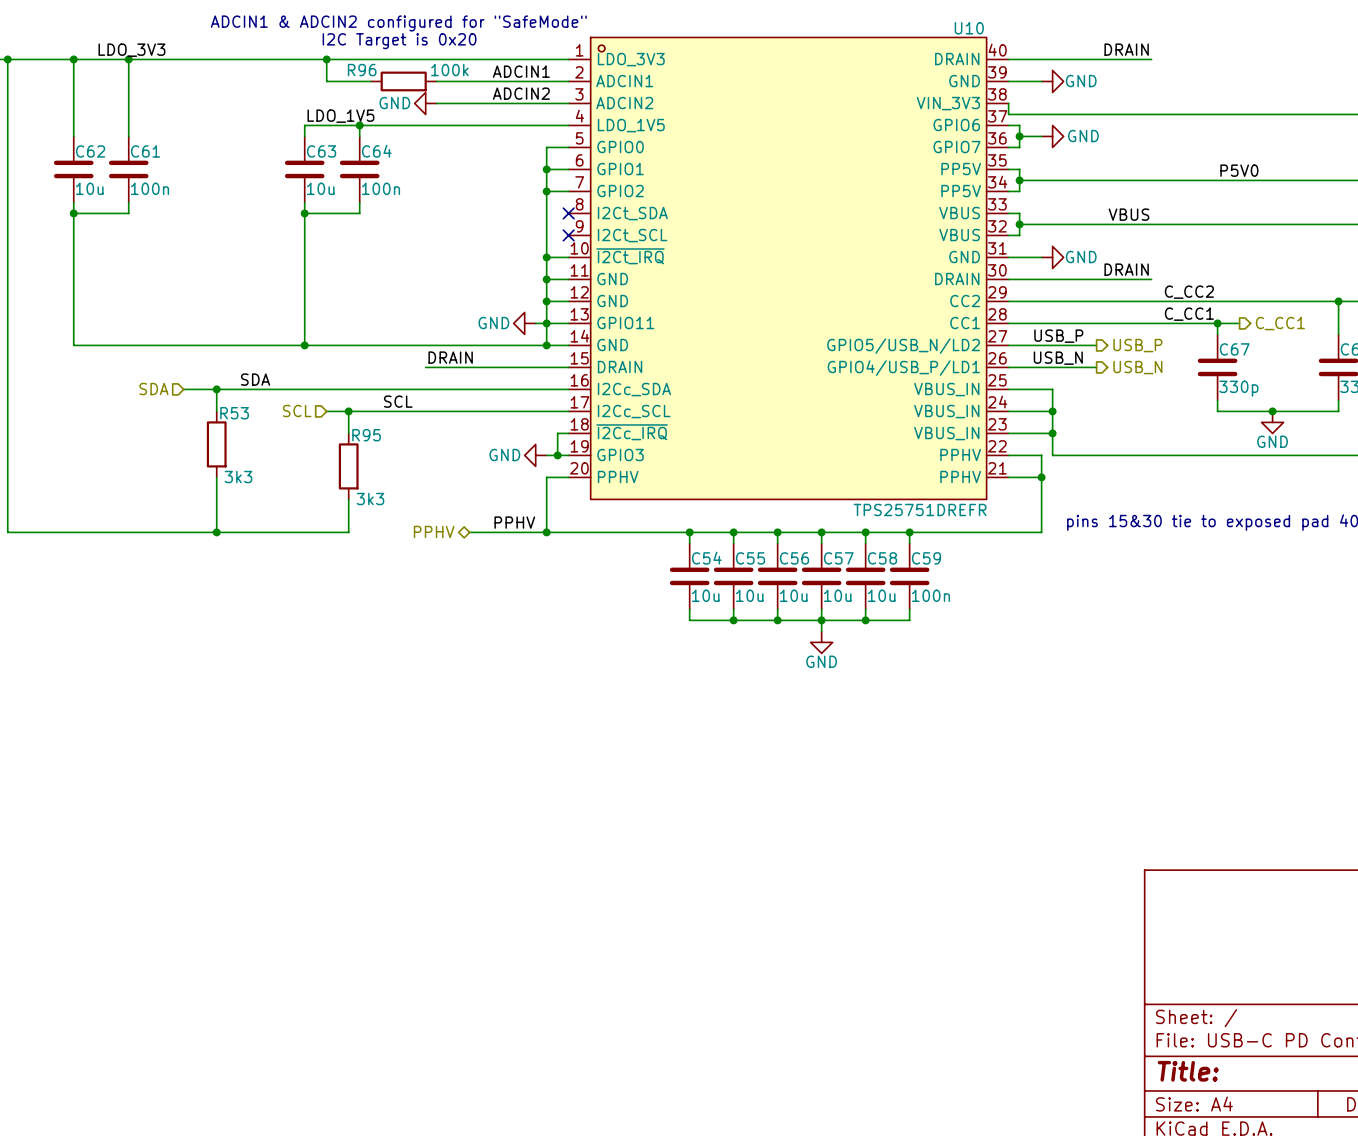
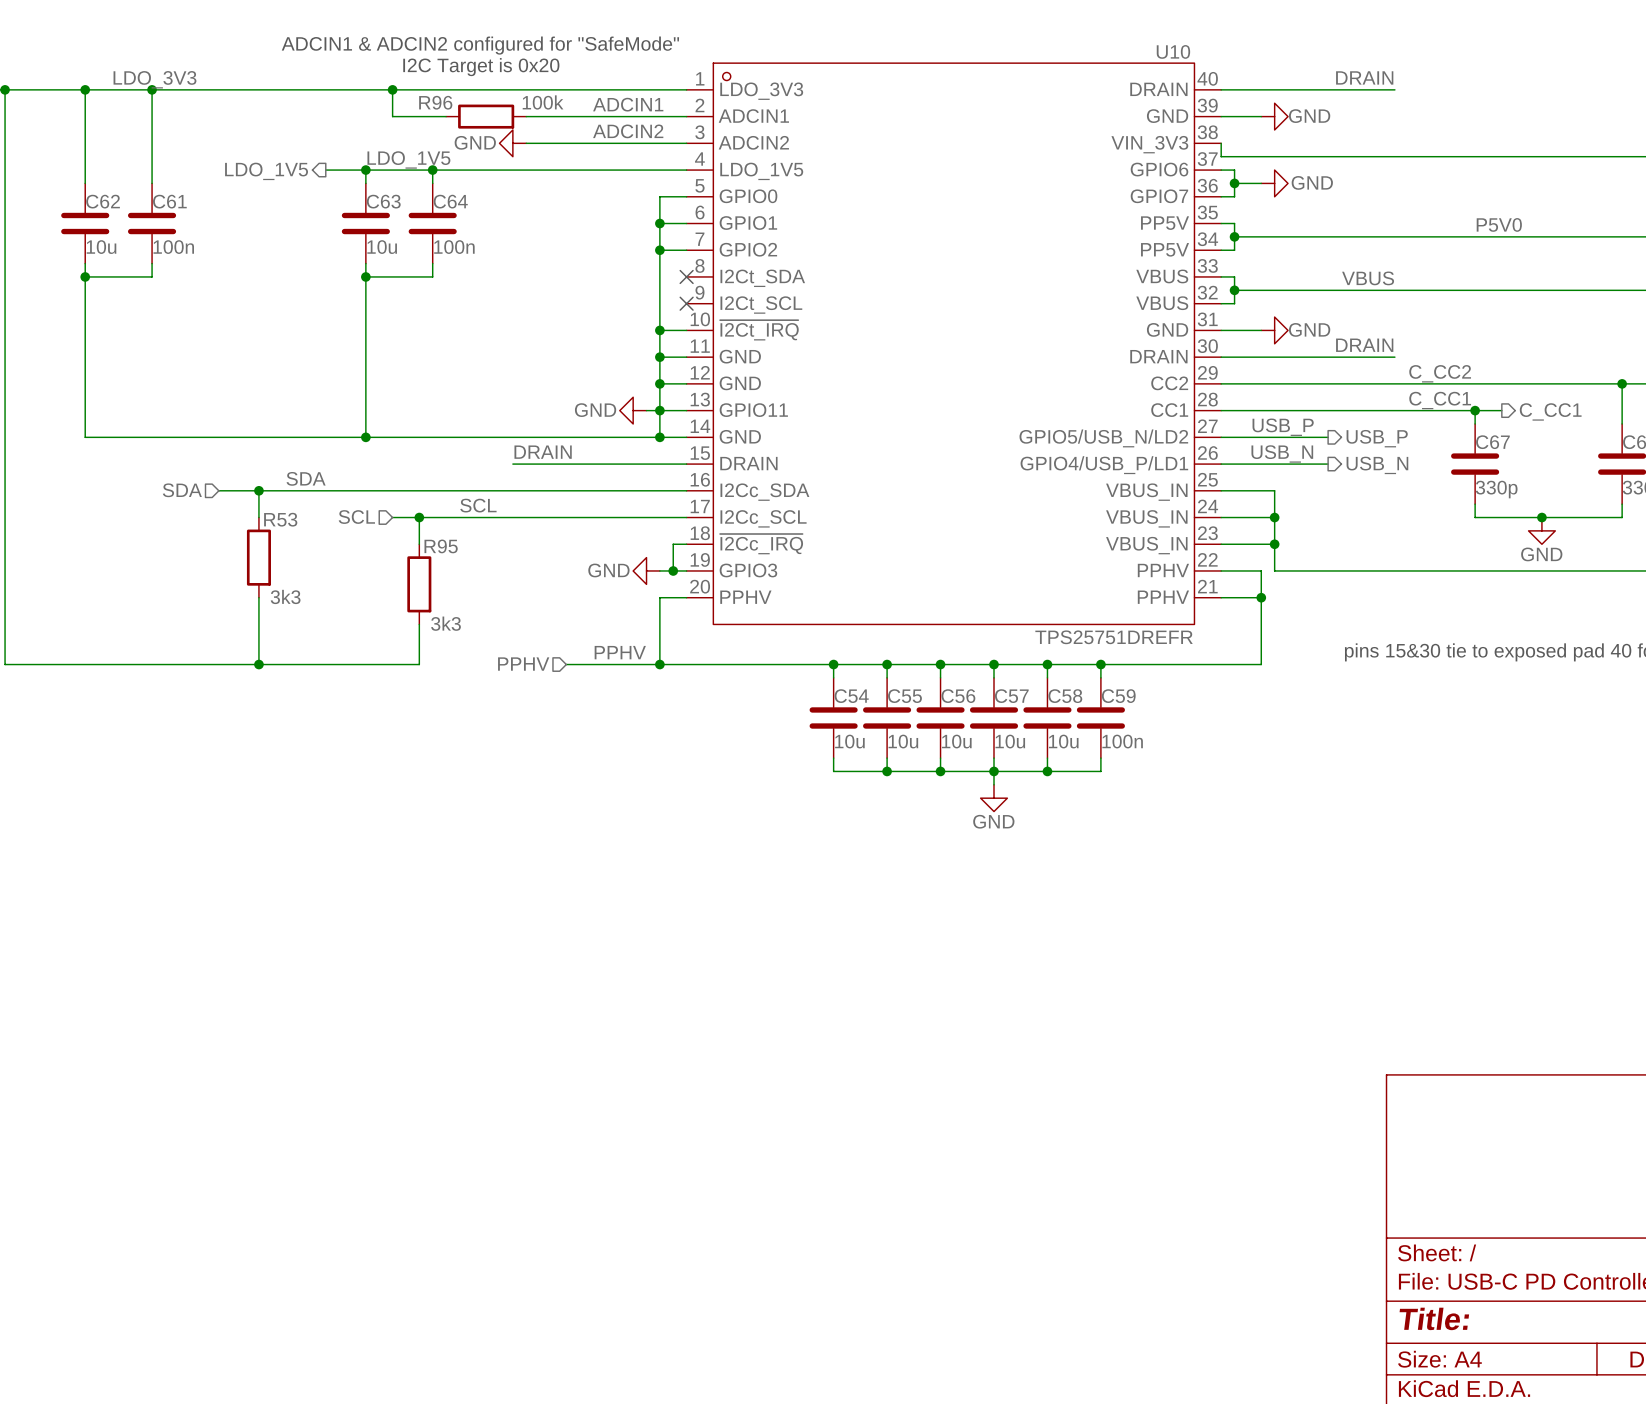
hierarchical label: none -> LDO_1V5 (266, 171)
wire: none -> (325, 170) (365, 170)
junction: none -> (365, 170)
hierarchical label shape: bidirectional (434, 531) -> input (523, 664)

